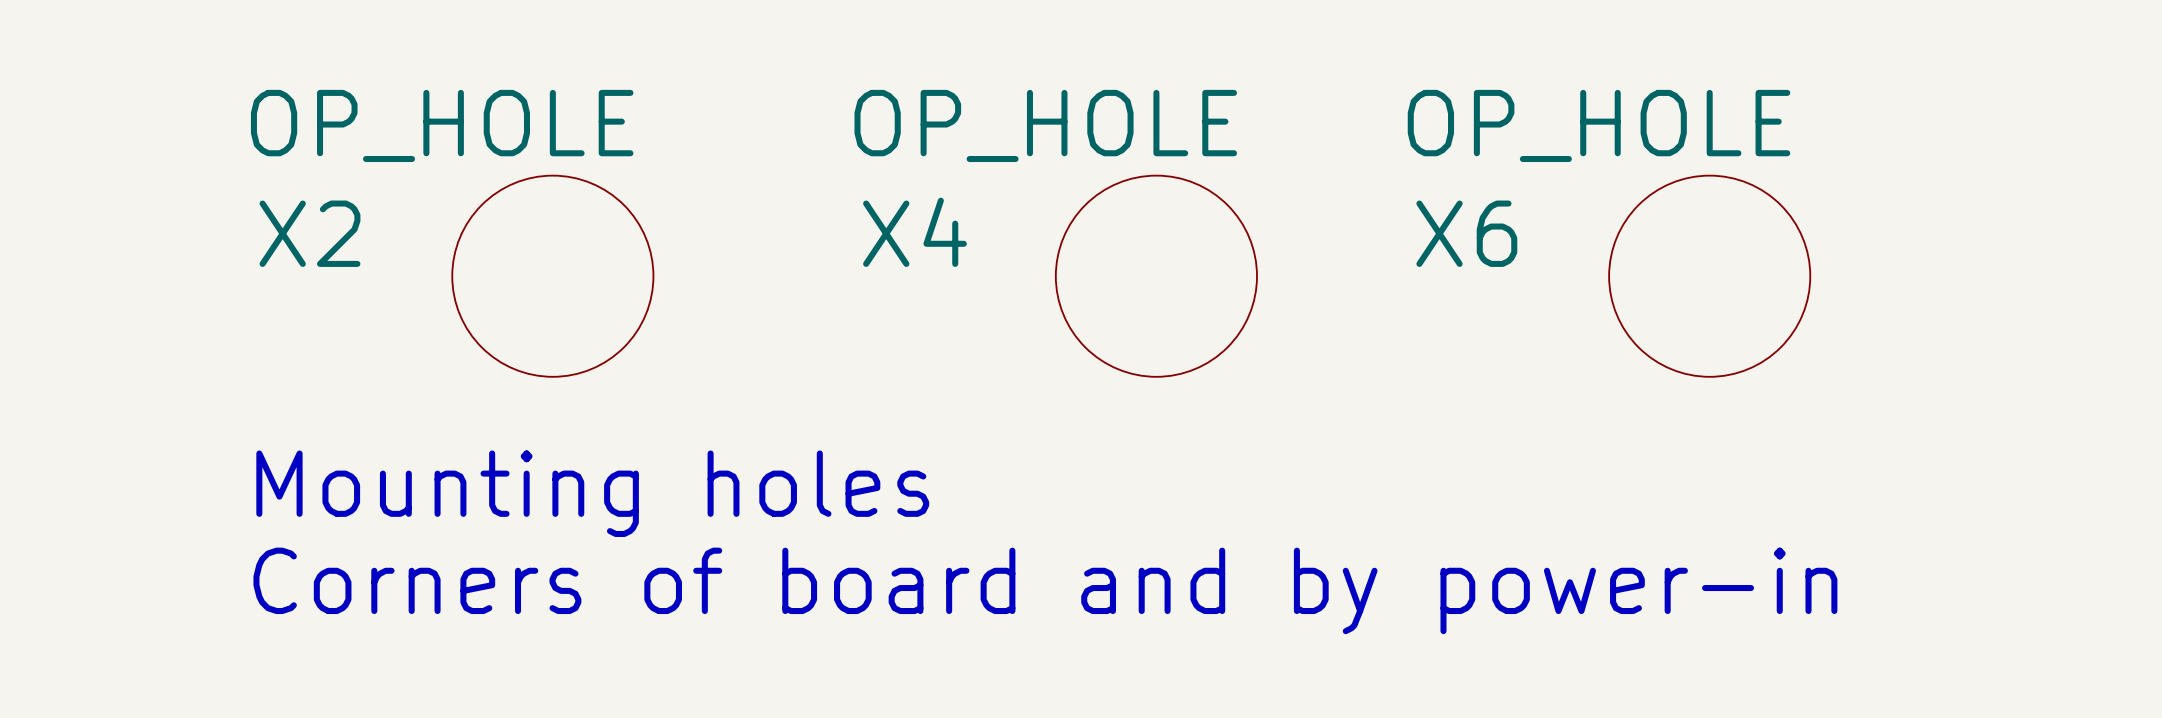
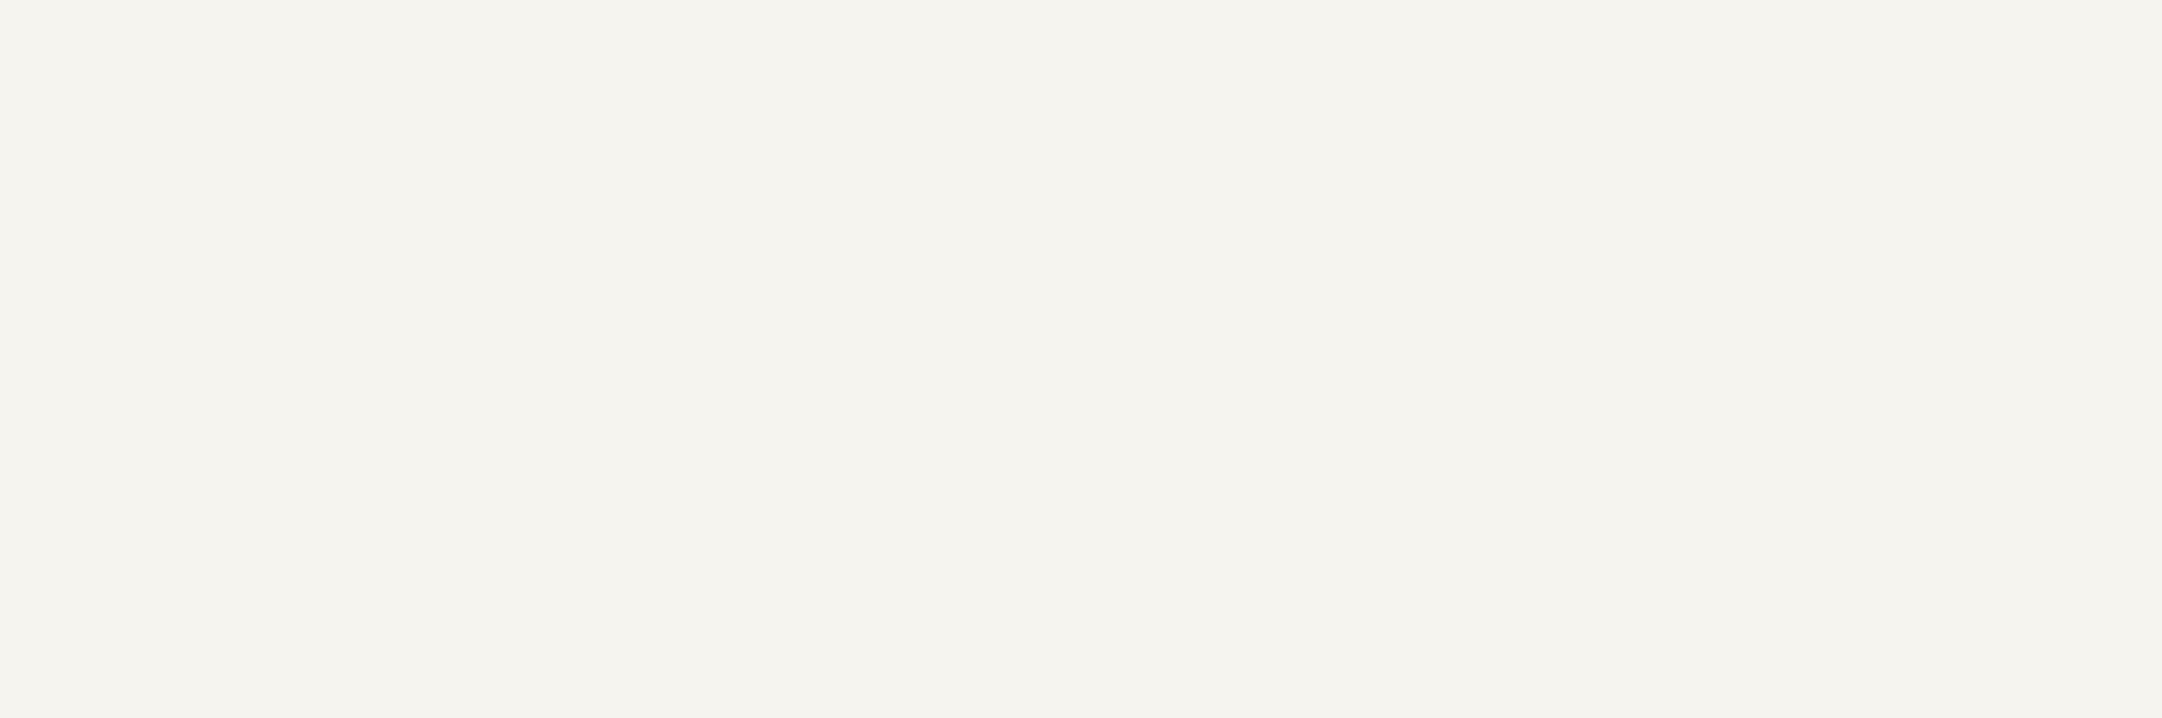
X2: OP_HOLE (552, 276) -> none
X4: OP_HOLE (1156, 276) -> none
X6: OP_HOLE (1709, 276) -> none
text: Mounting holes (592, 493) -> none
text: Corners of board and by power-in (1045, 590) -> none

